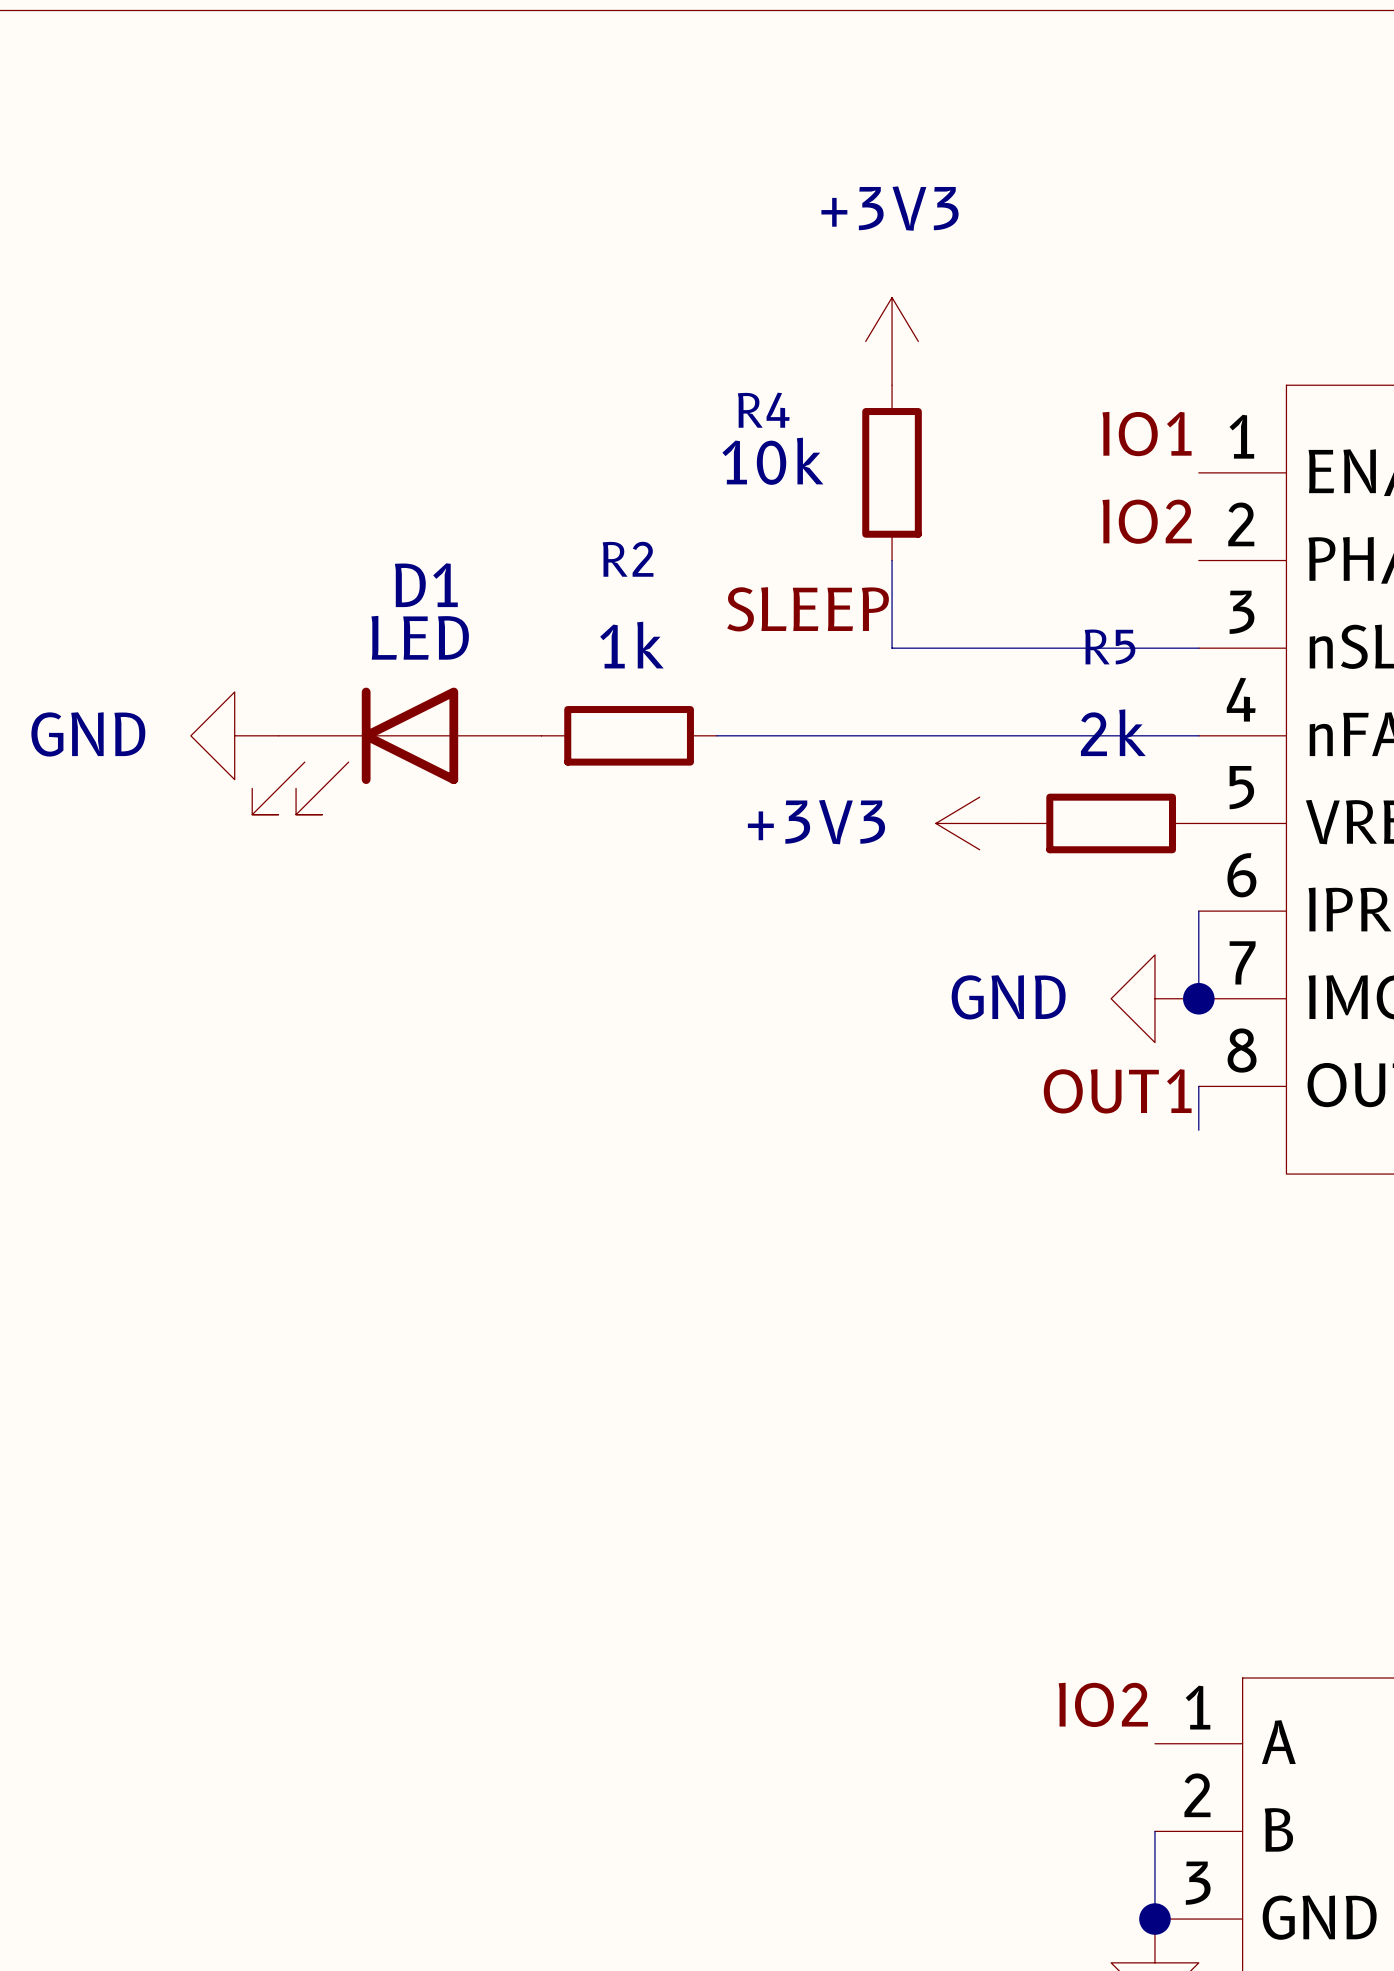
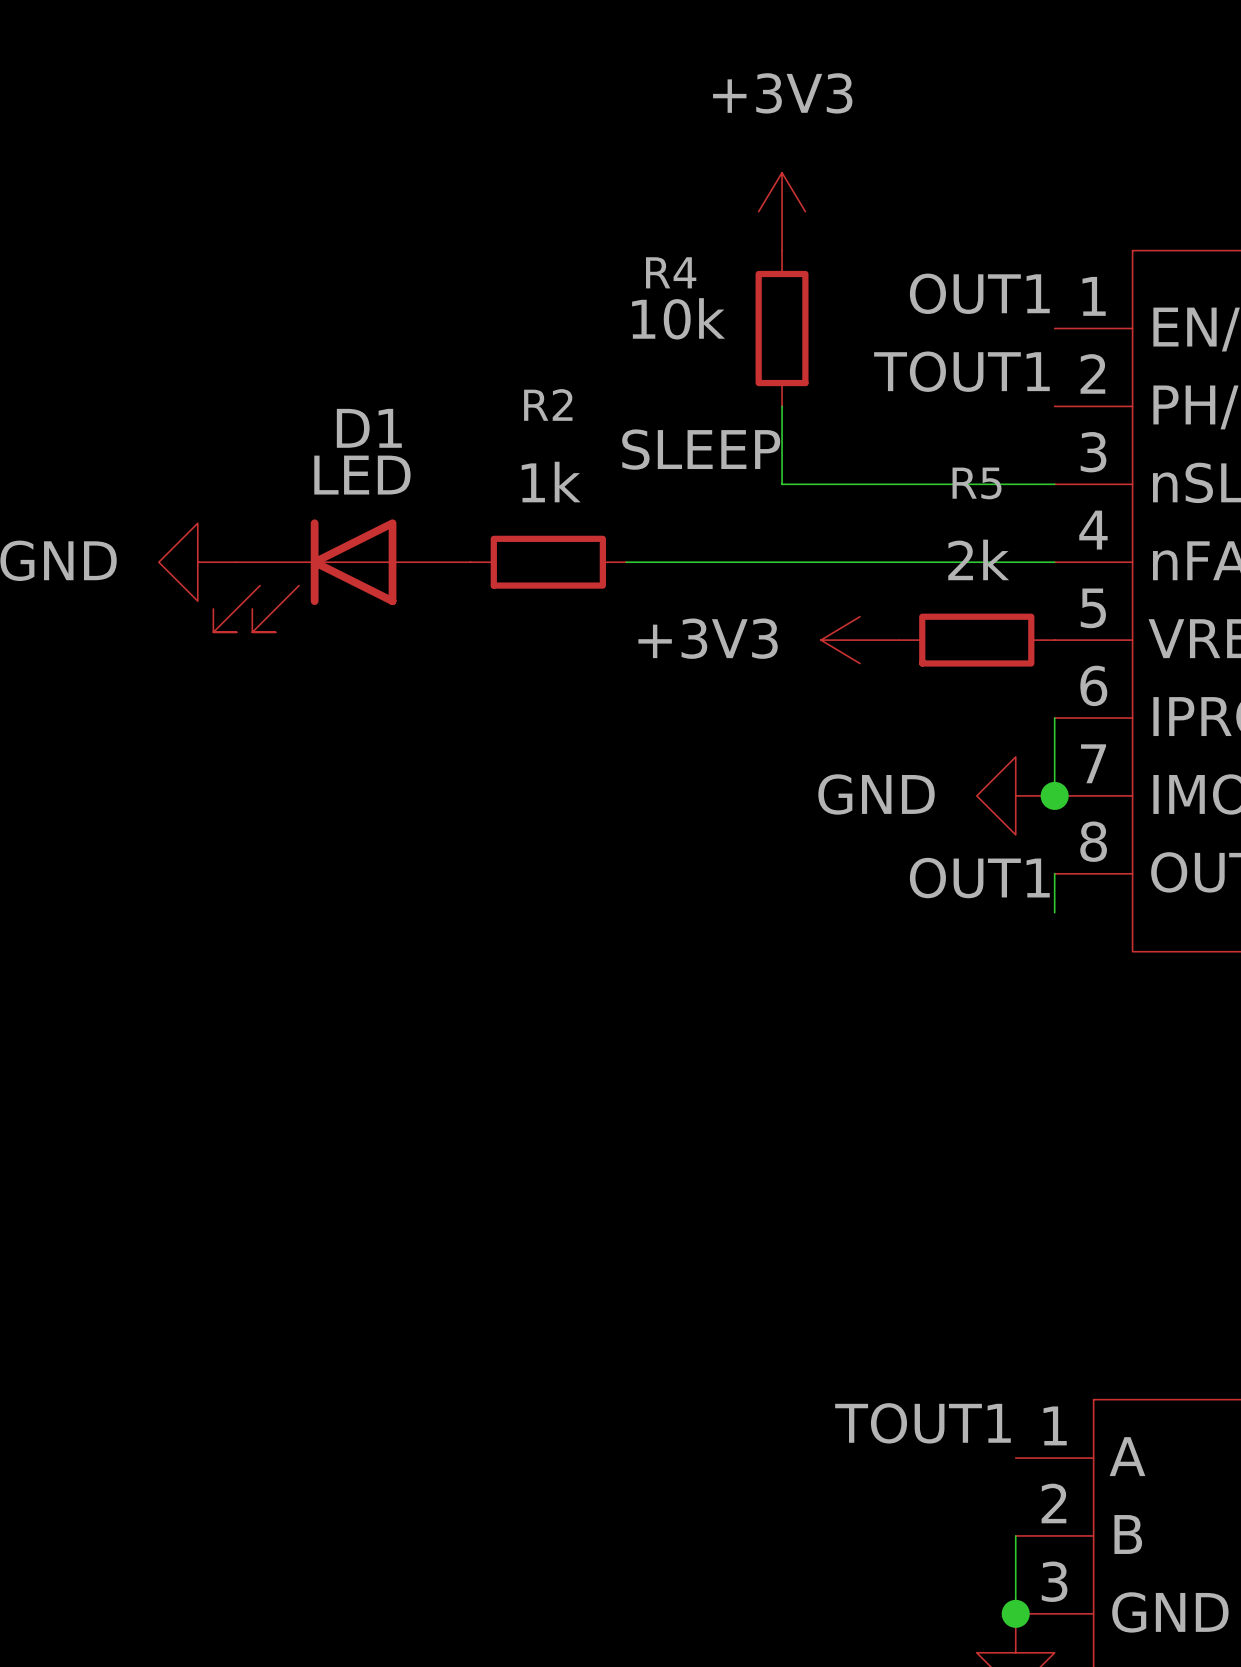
label: IO1 (1147, 434) -> OUT1 (979, 293)
label: IO2 (1147, 521) -> TOUT1 (961, 371)
label: IO2 (1103, 1704) -> TOUT1 (922, 1423)

